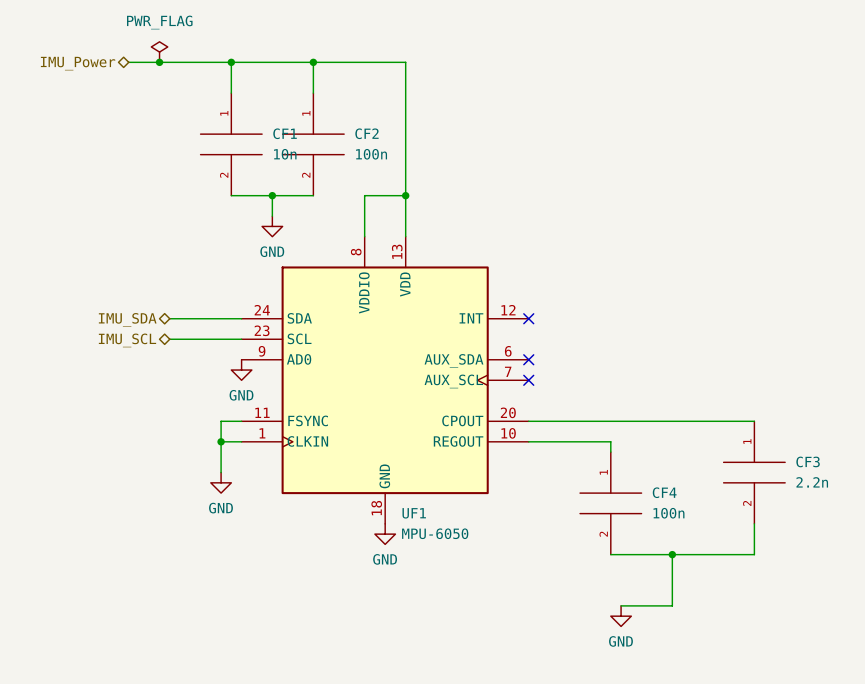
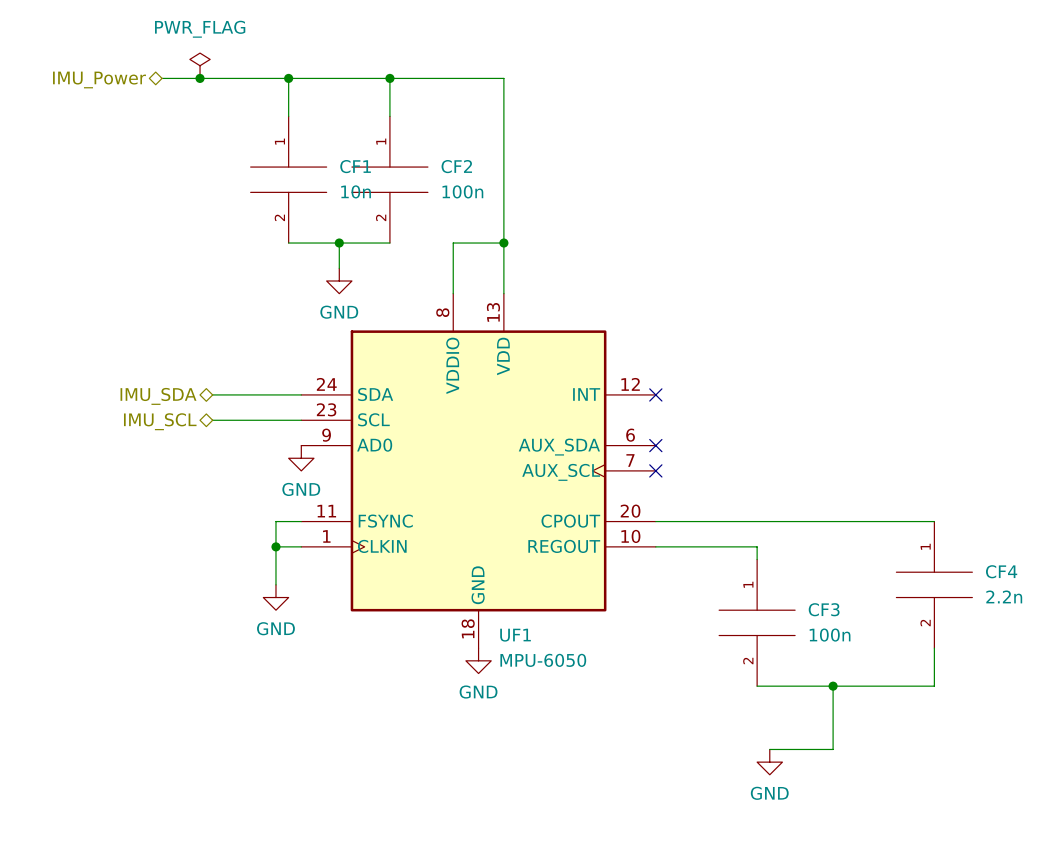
CF3 name: CF3 (808, 461) -> CF4 (1001, 571)
CF4 name: CF4 (664, 492) -> CF3 (824, 609)

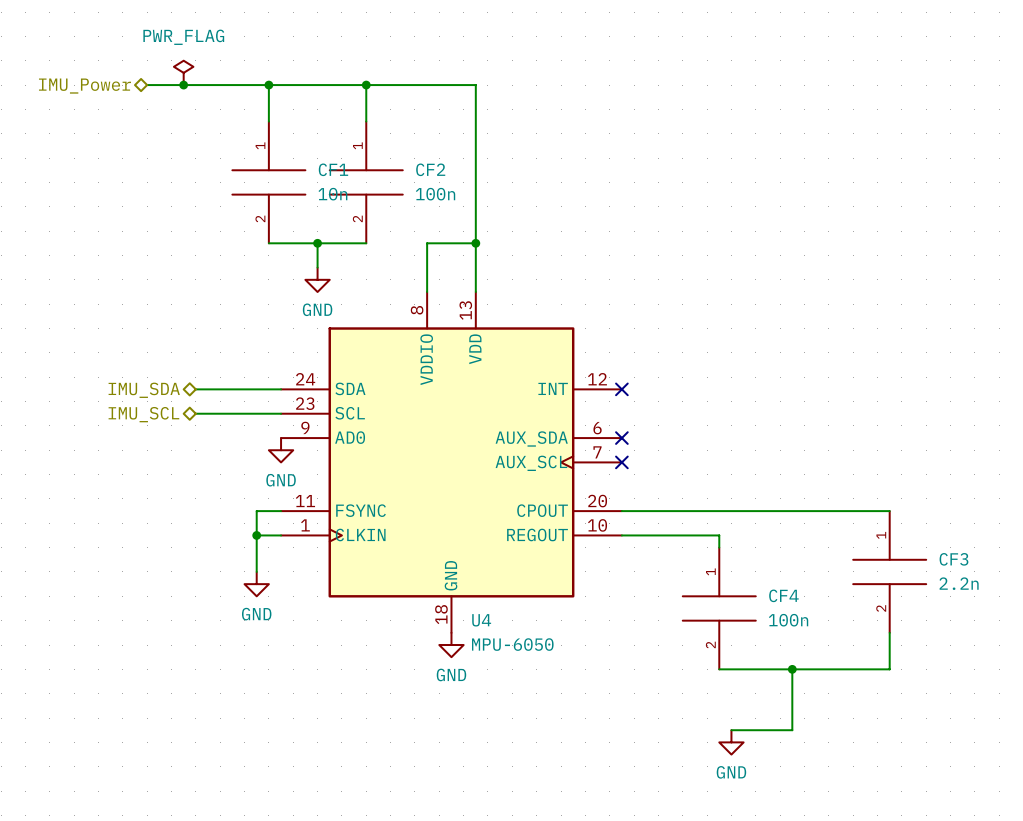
CF4 name: CF4 (1001, 571) -> CF3 (953, 559)
CF3 name: CF3 (824, 609) -> CF4 (783, 595)
UF1 name: UF1 (515, 635) -> U4 (481, 620)

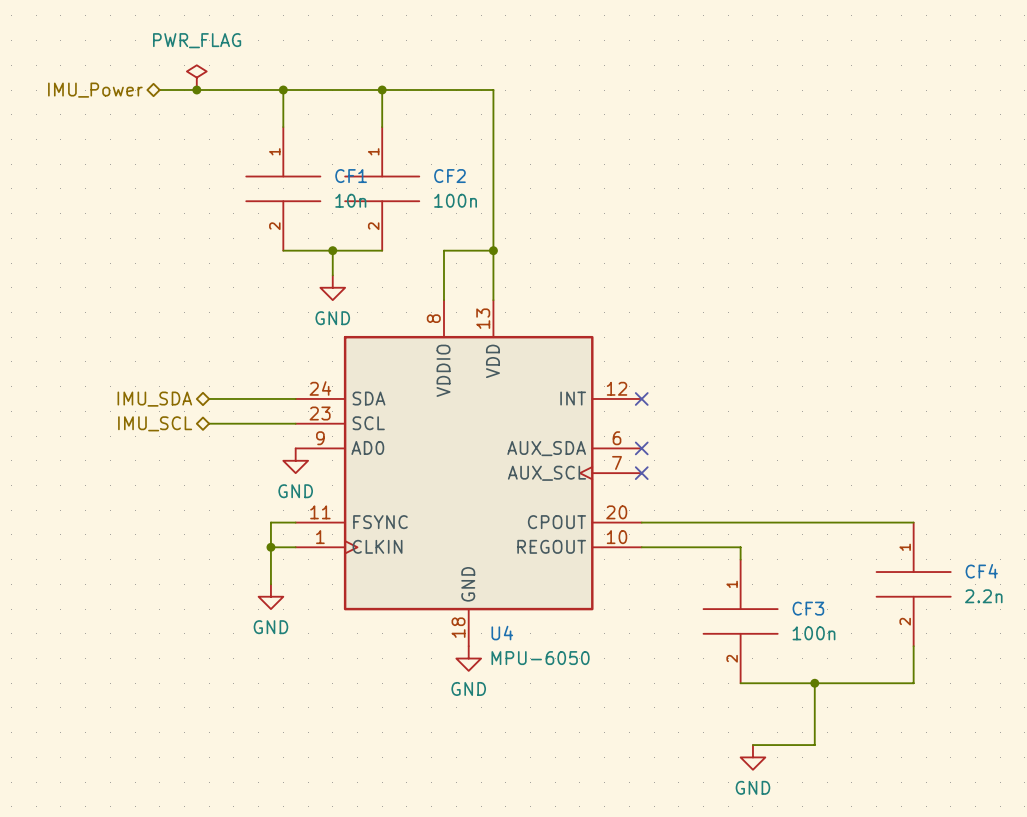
CF3 name: CF3 (953, 559) -> CF4 (981, 571)
CF4 name: CF4 (783, 595) -> CF3 (808, 608)

